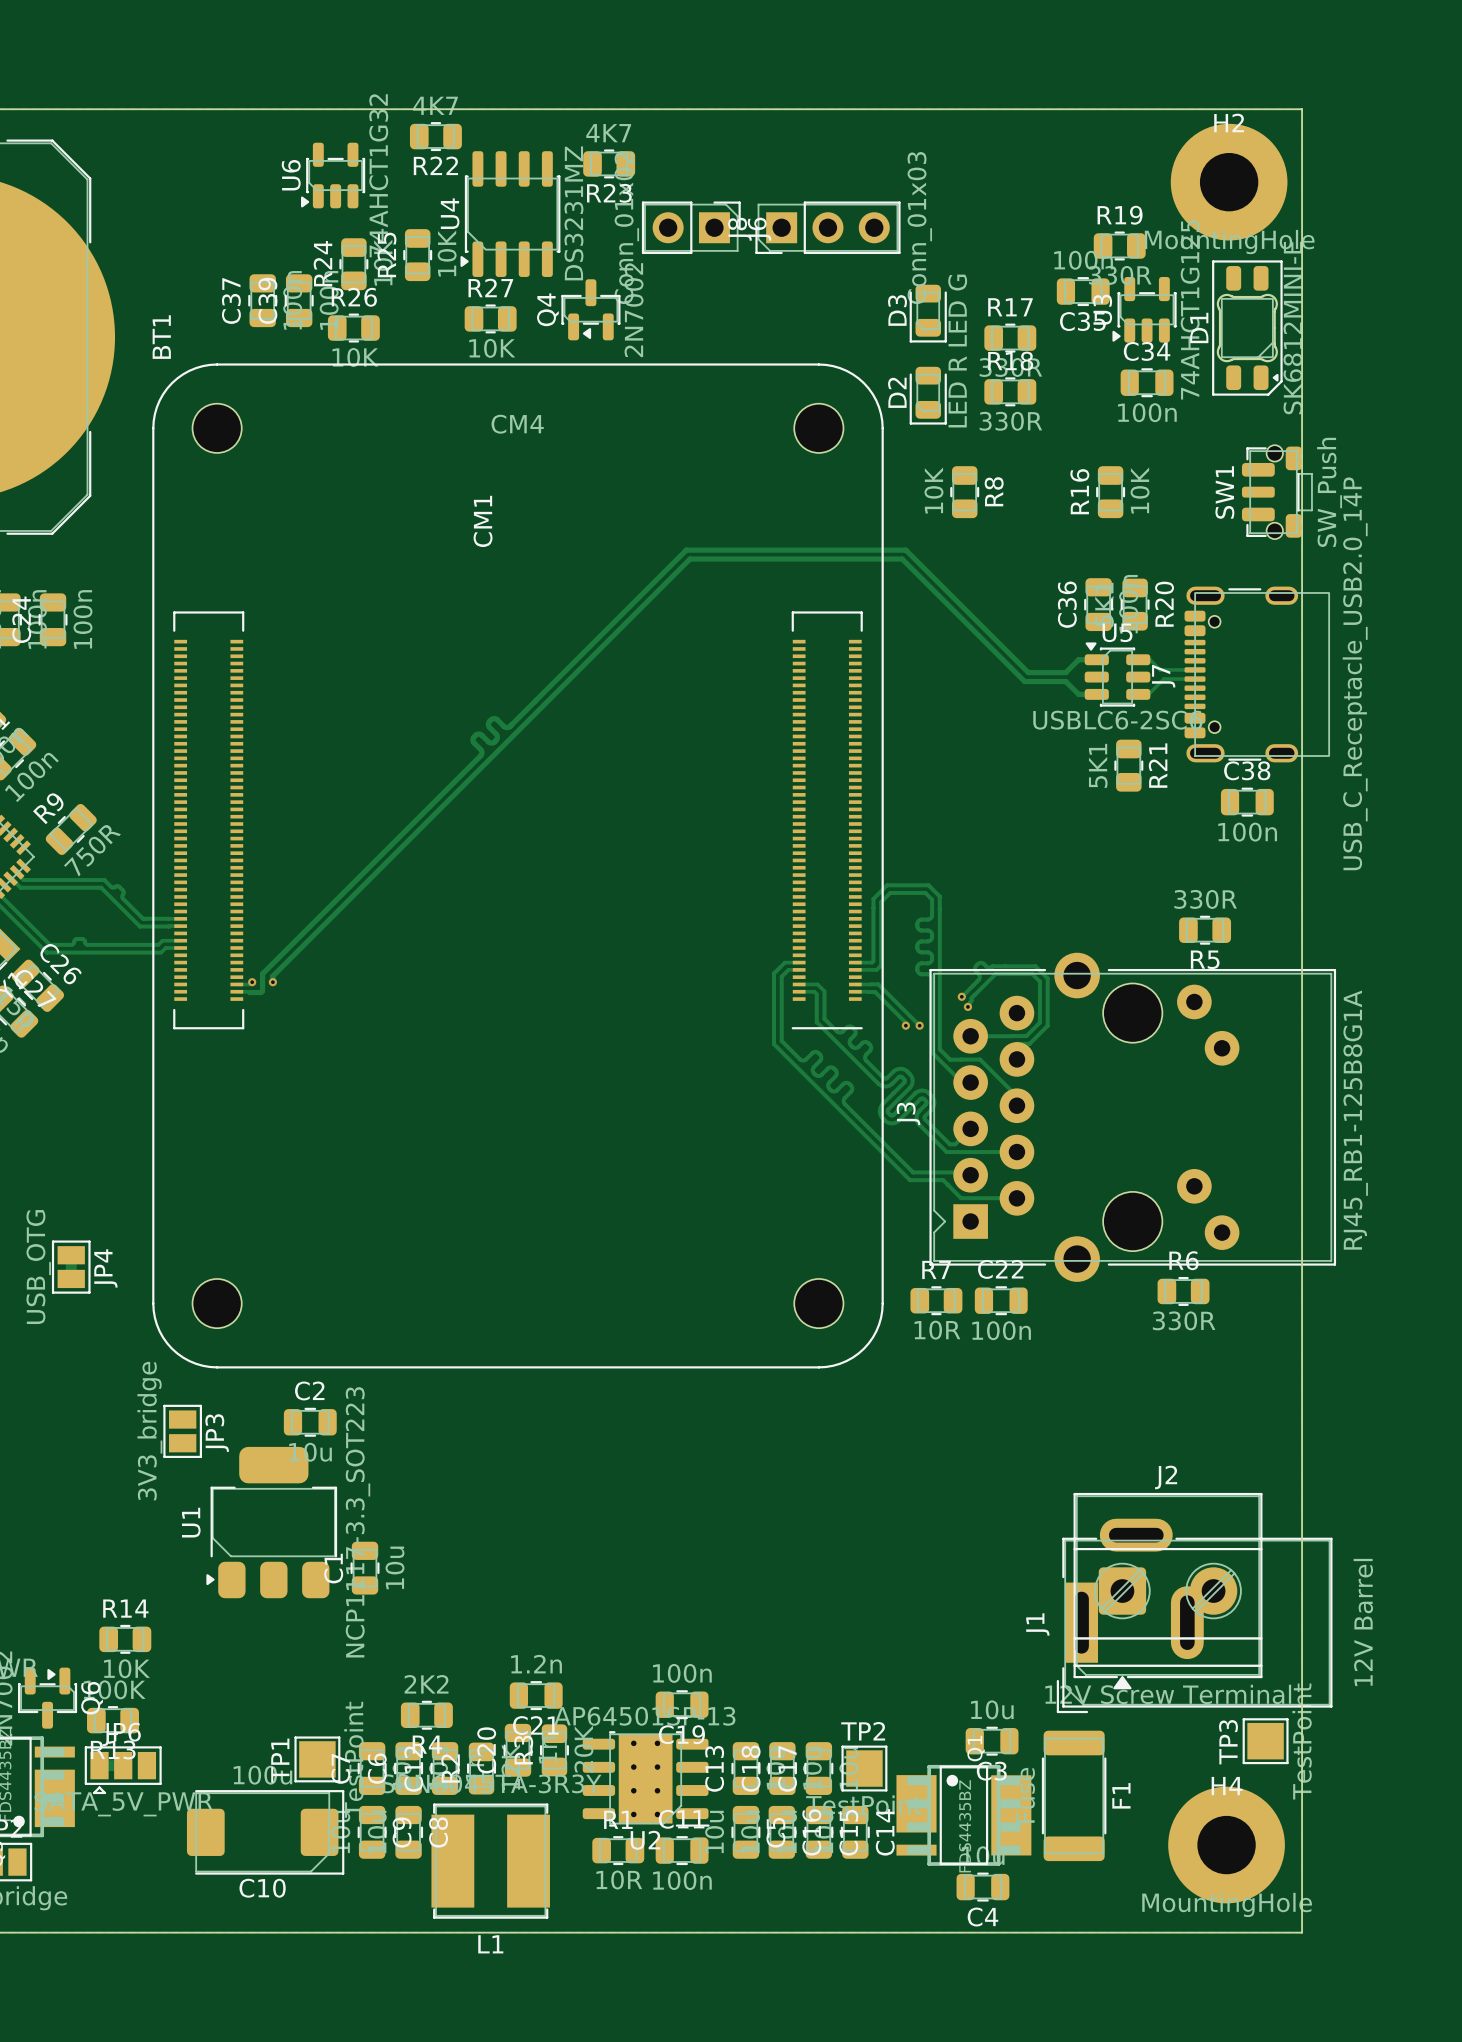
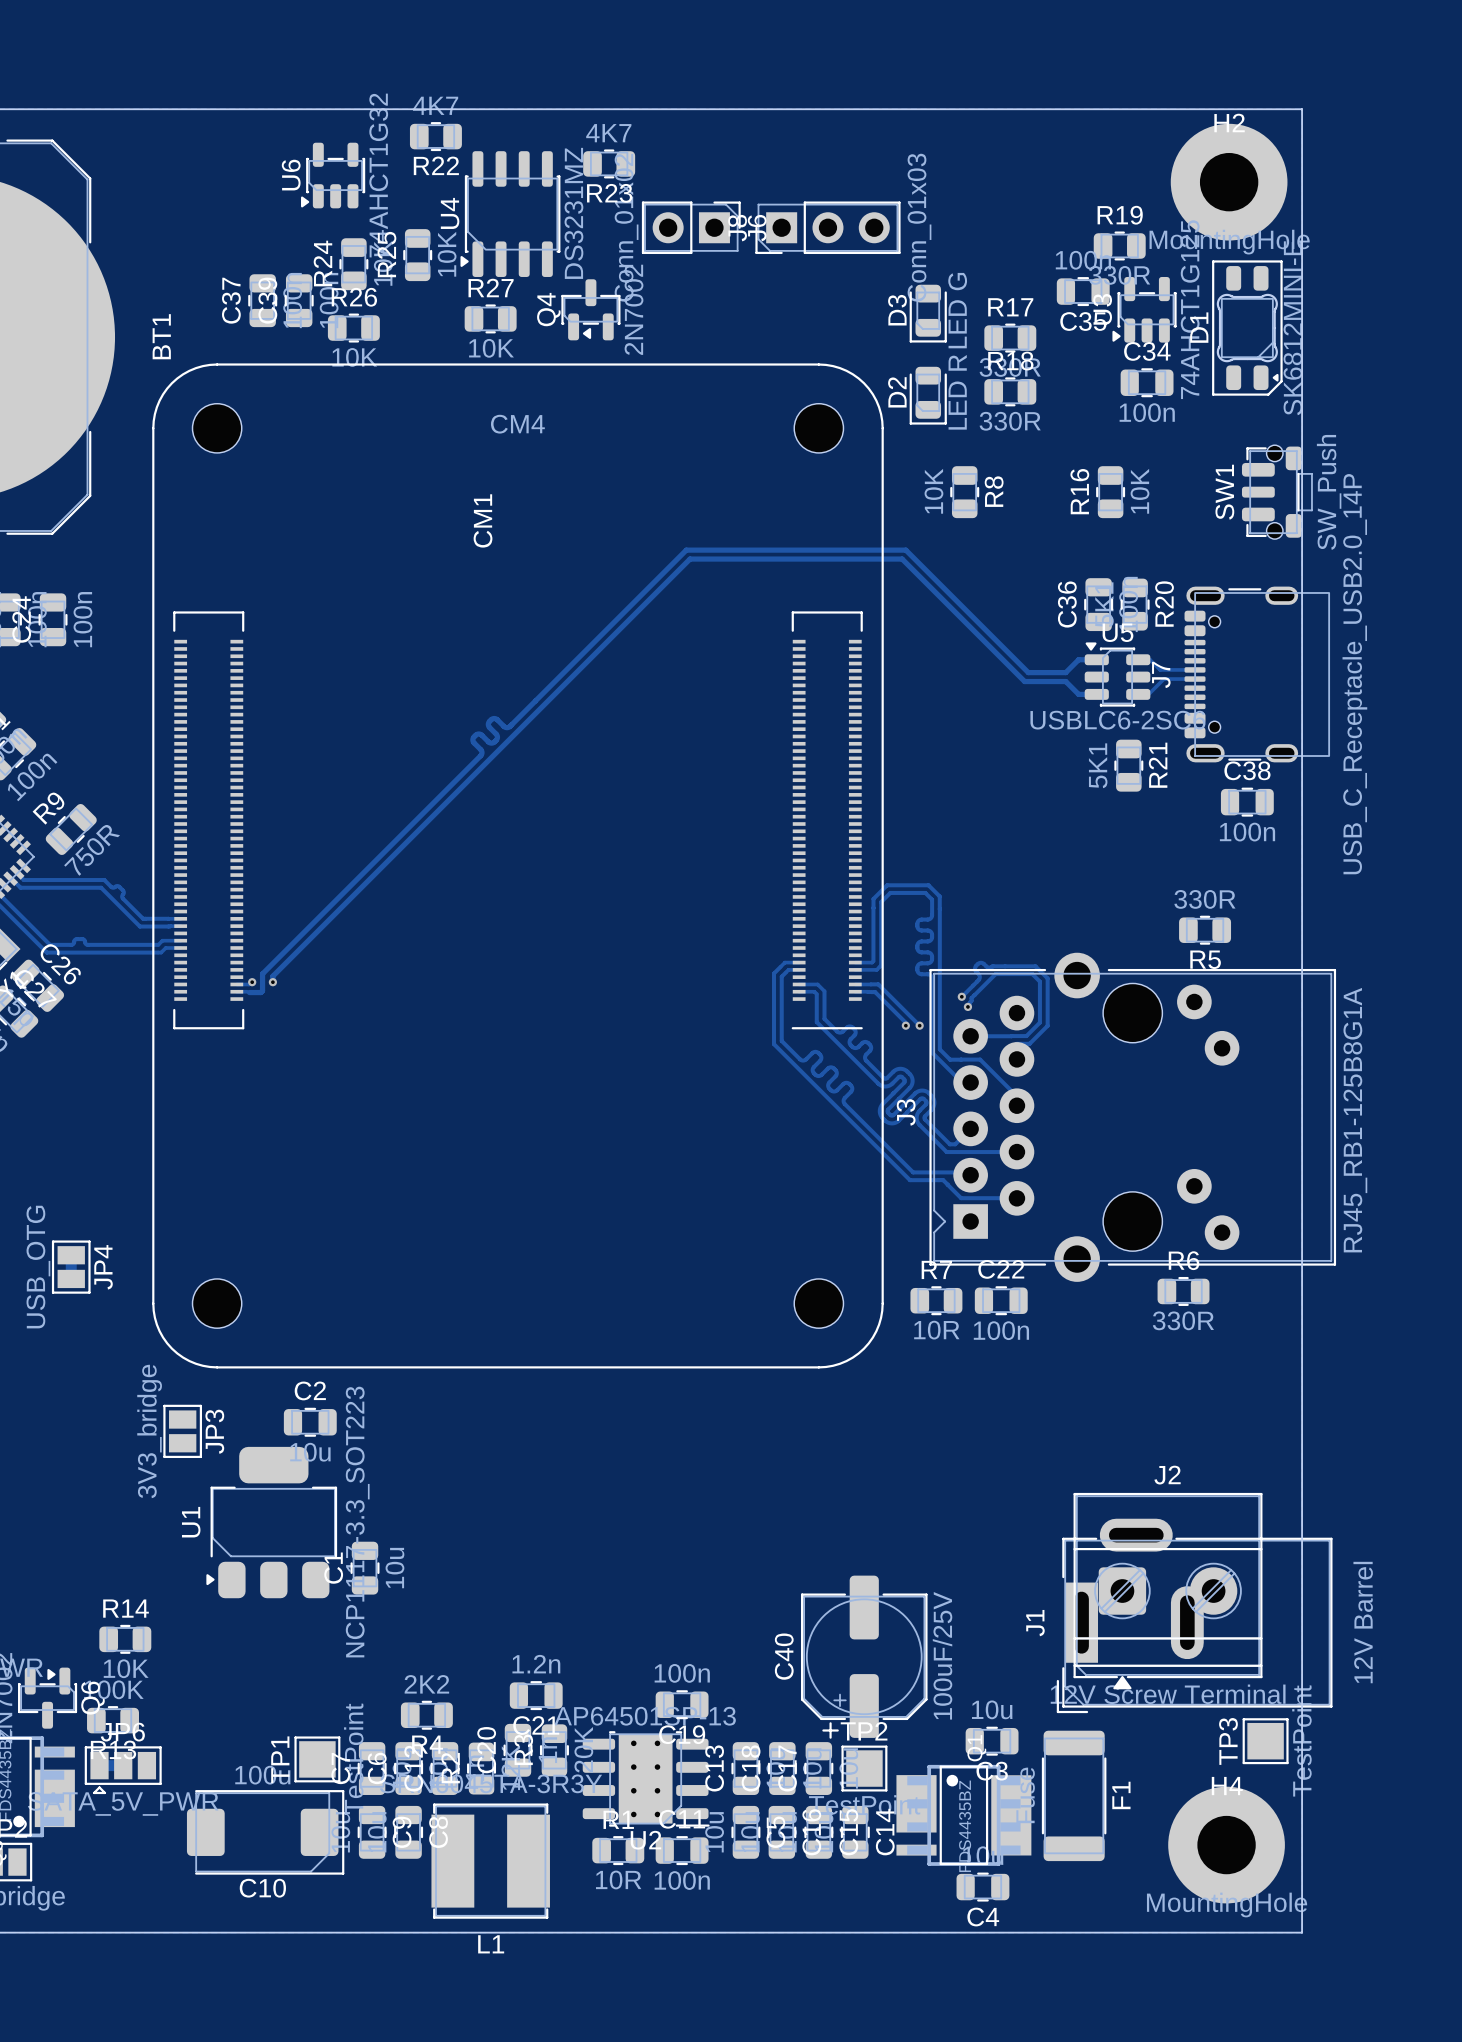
C40: none -> 100uF/25V (864, 1657)

